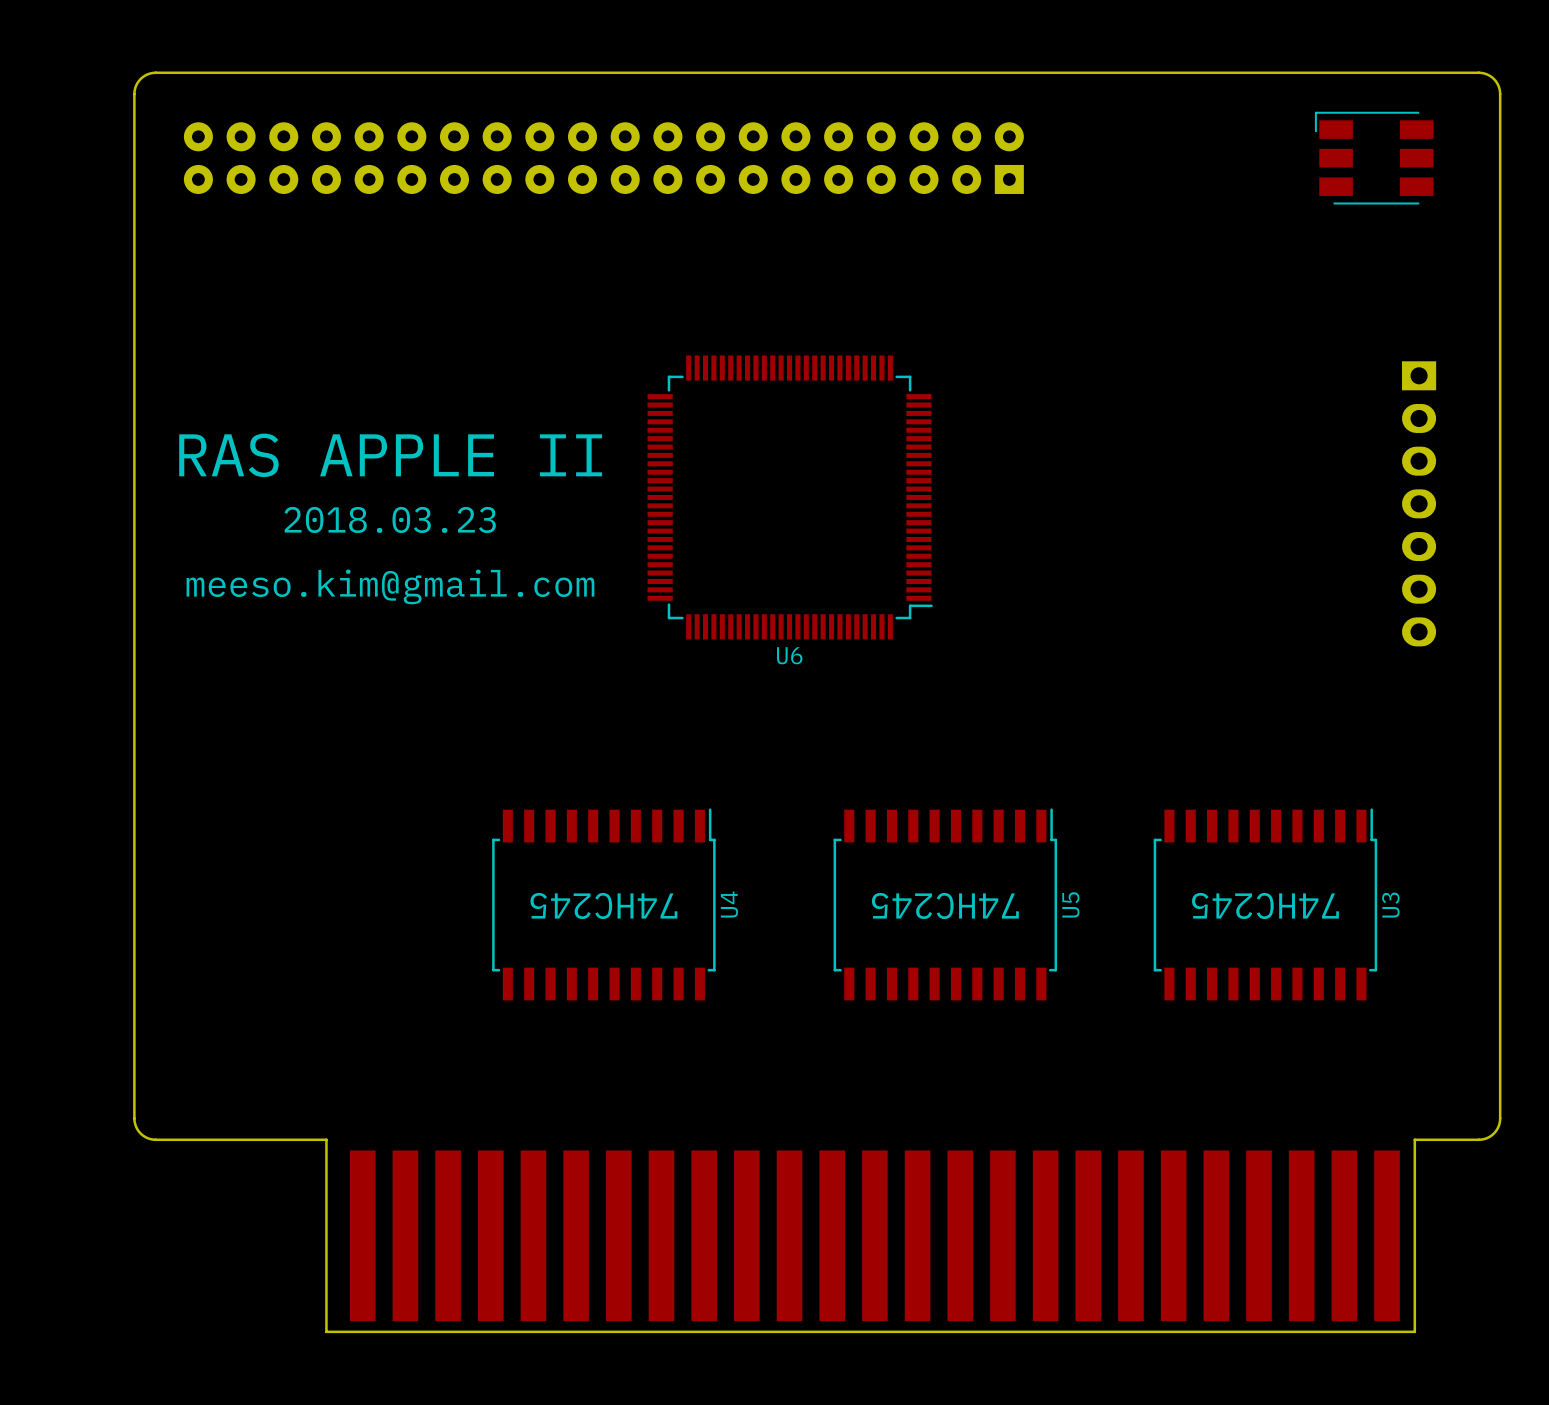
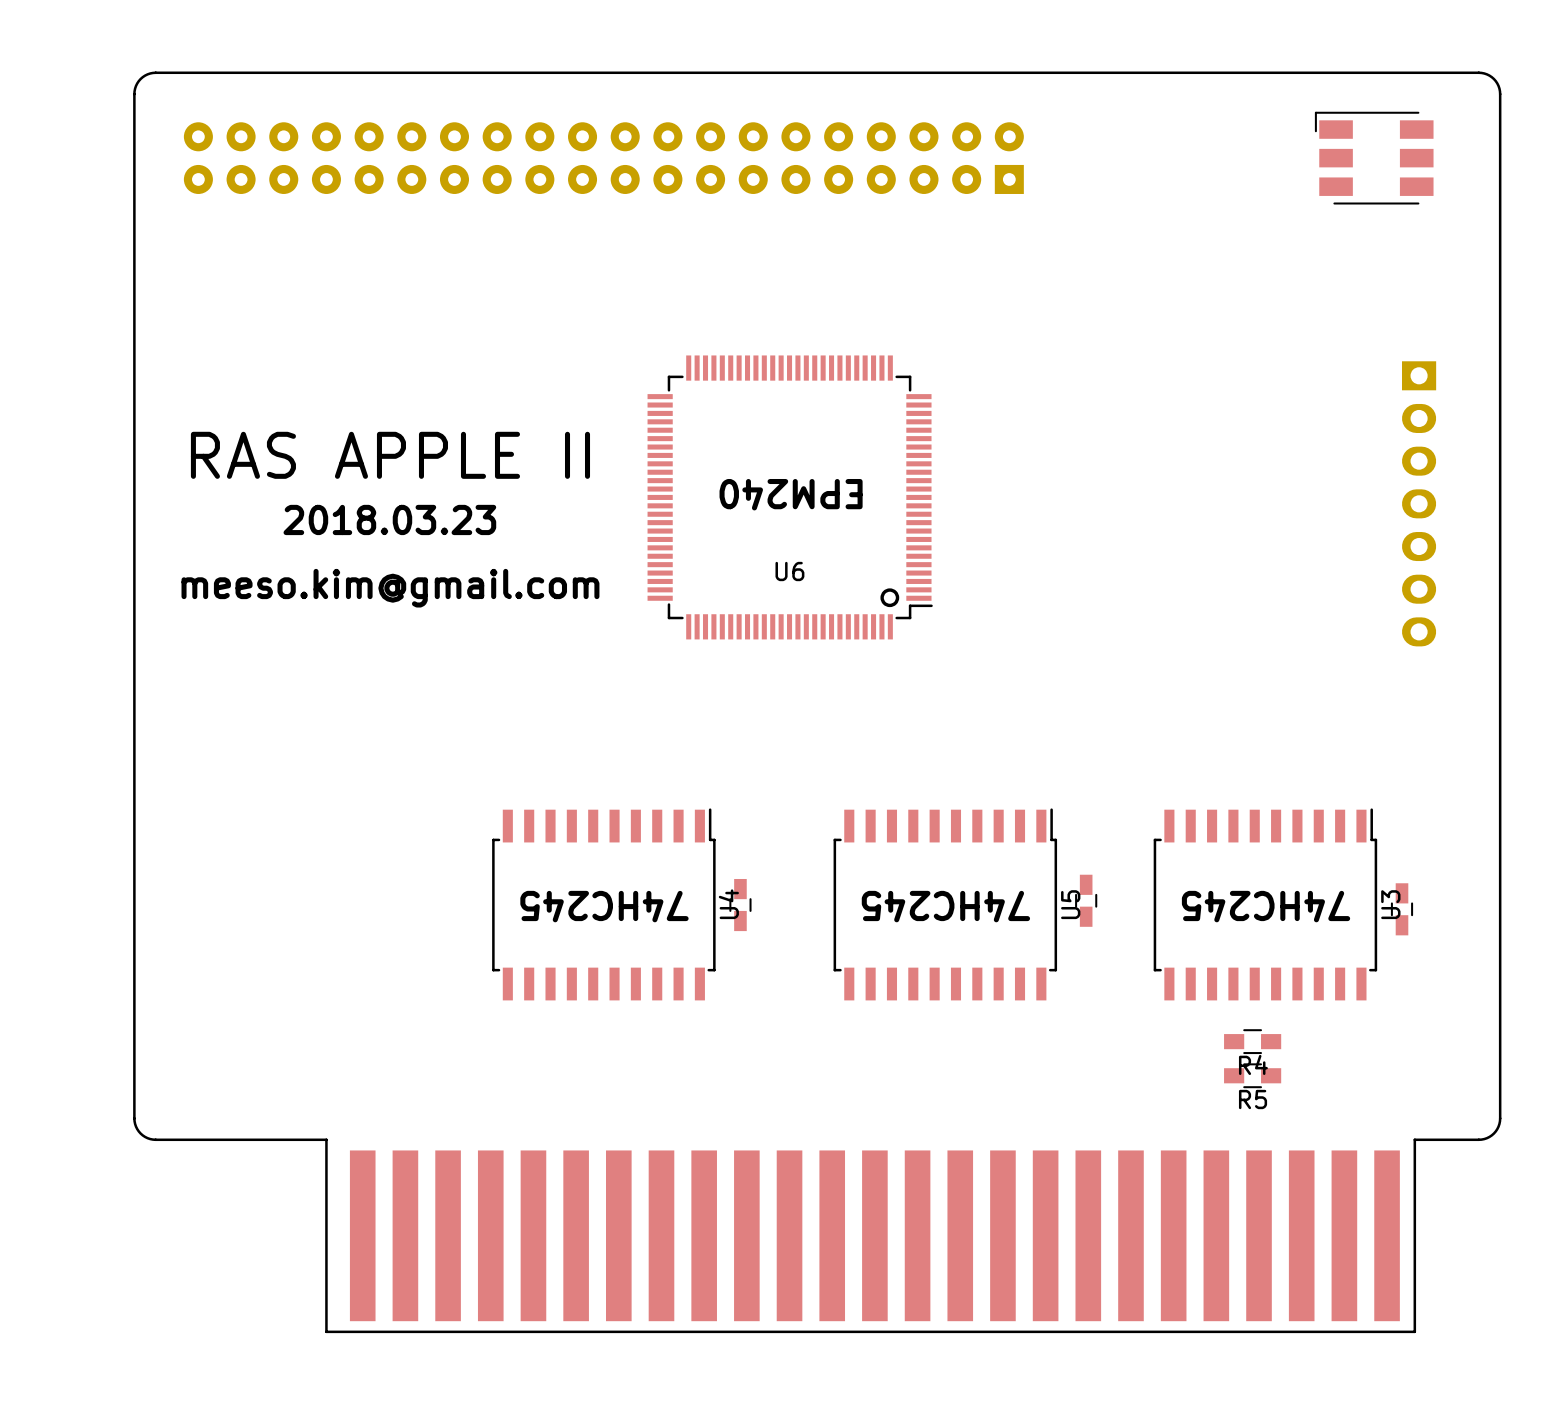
text: none -> EPM240 (791, 494)
drawing: none -> [880, 588, 900, 608]
U6 name position: U6 (789, 655) -> U6 (789, 571)
part: none -> (1086, 900)
part: none -> (740, 905)
part: none -> (1402, 909)
R4: none -> (1252, 1041)
R5: none -> (1252, 1075)

